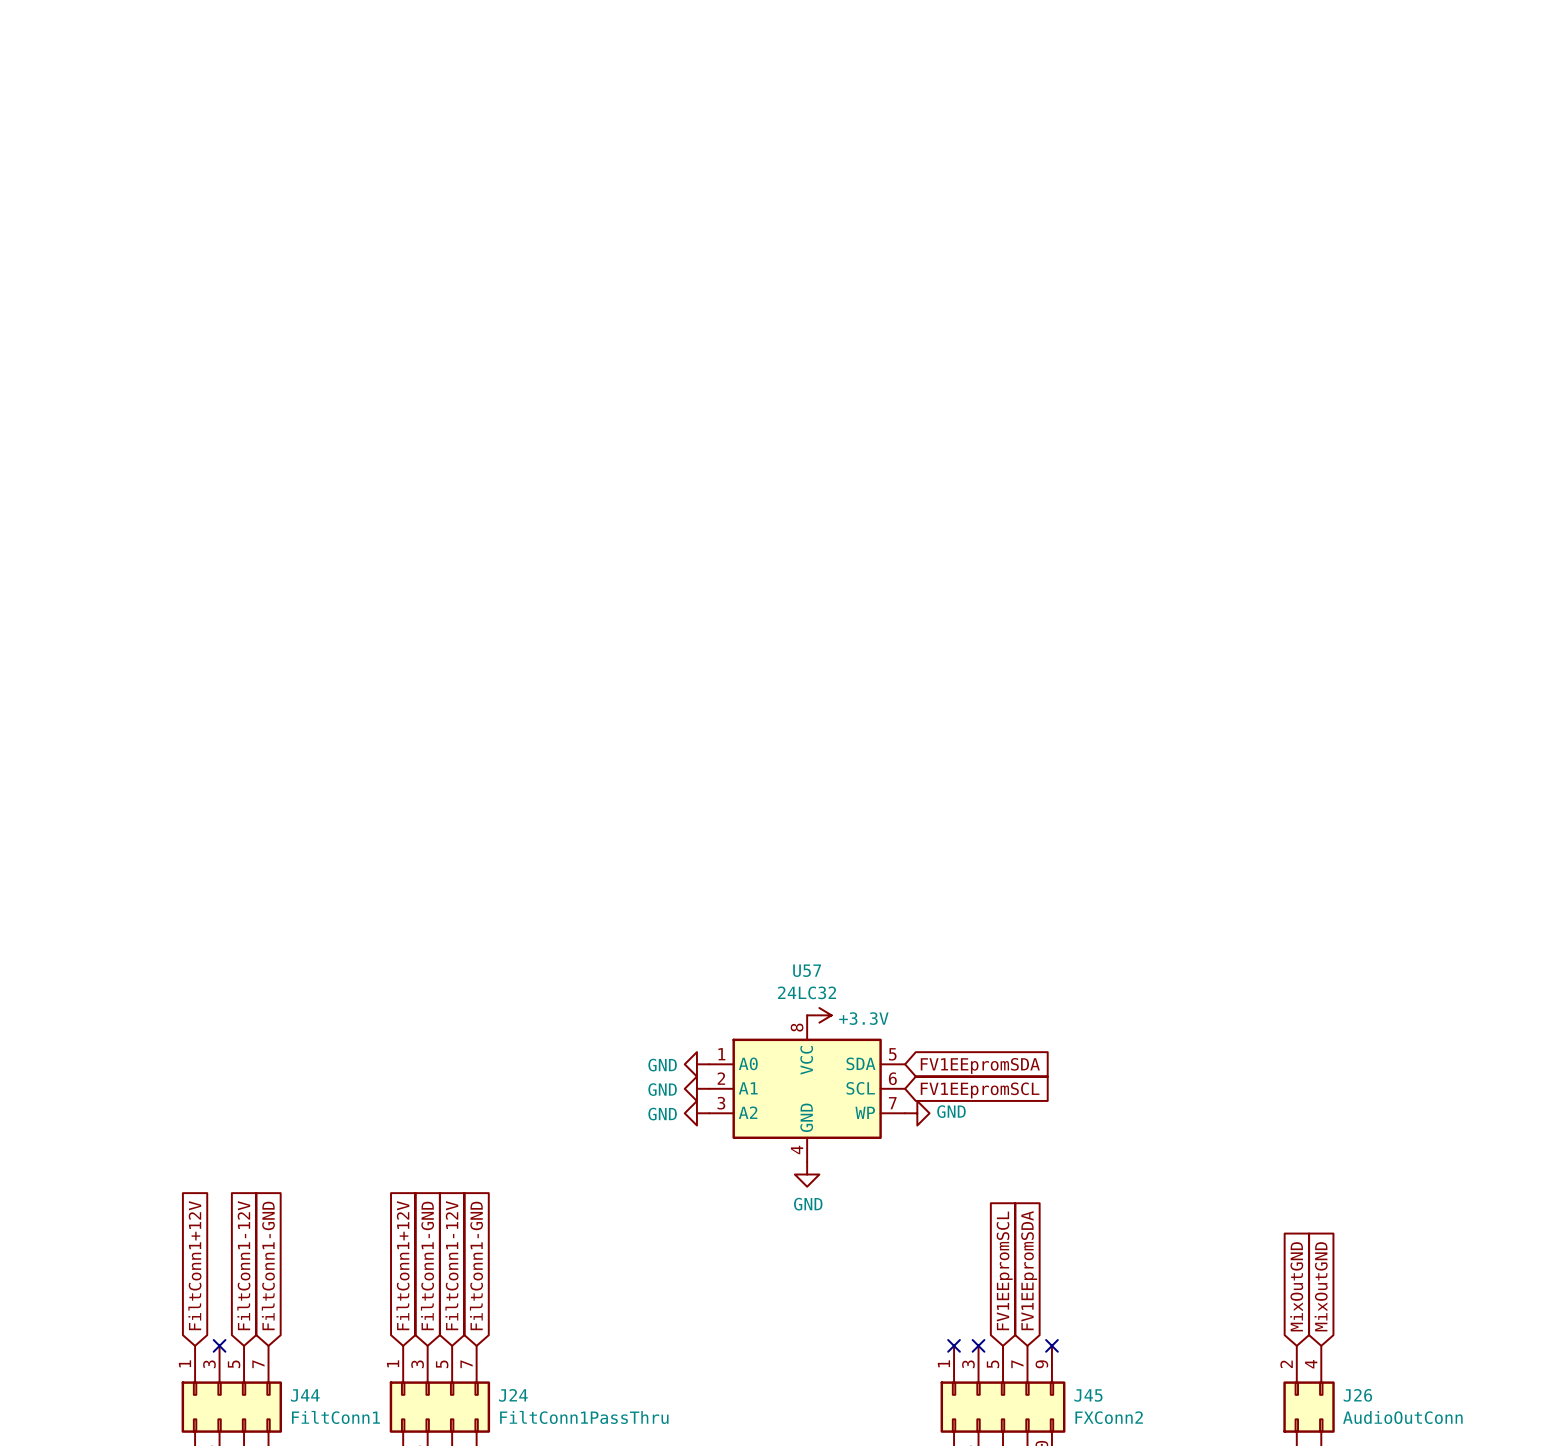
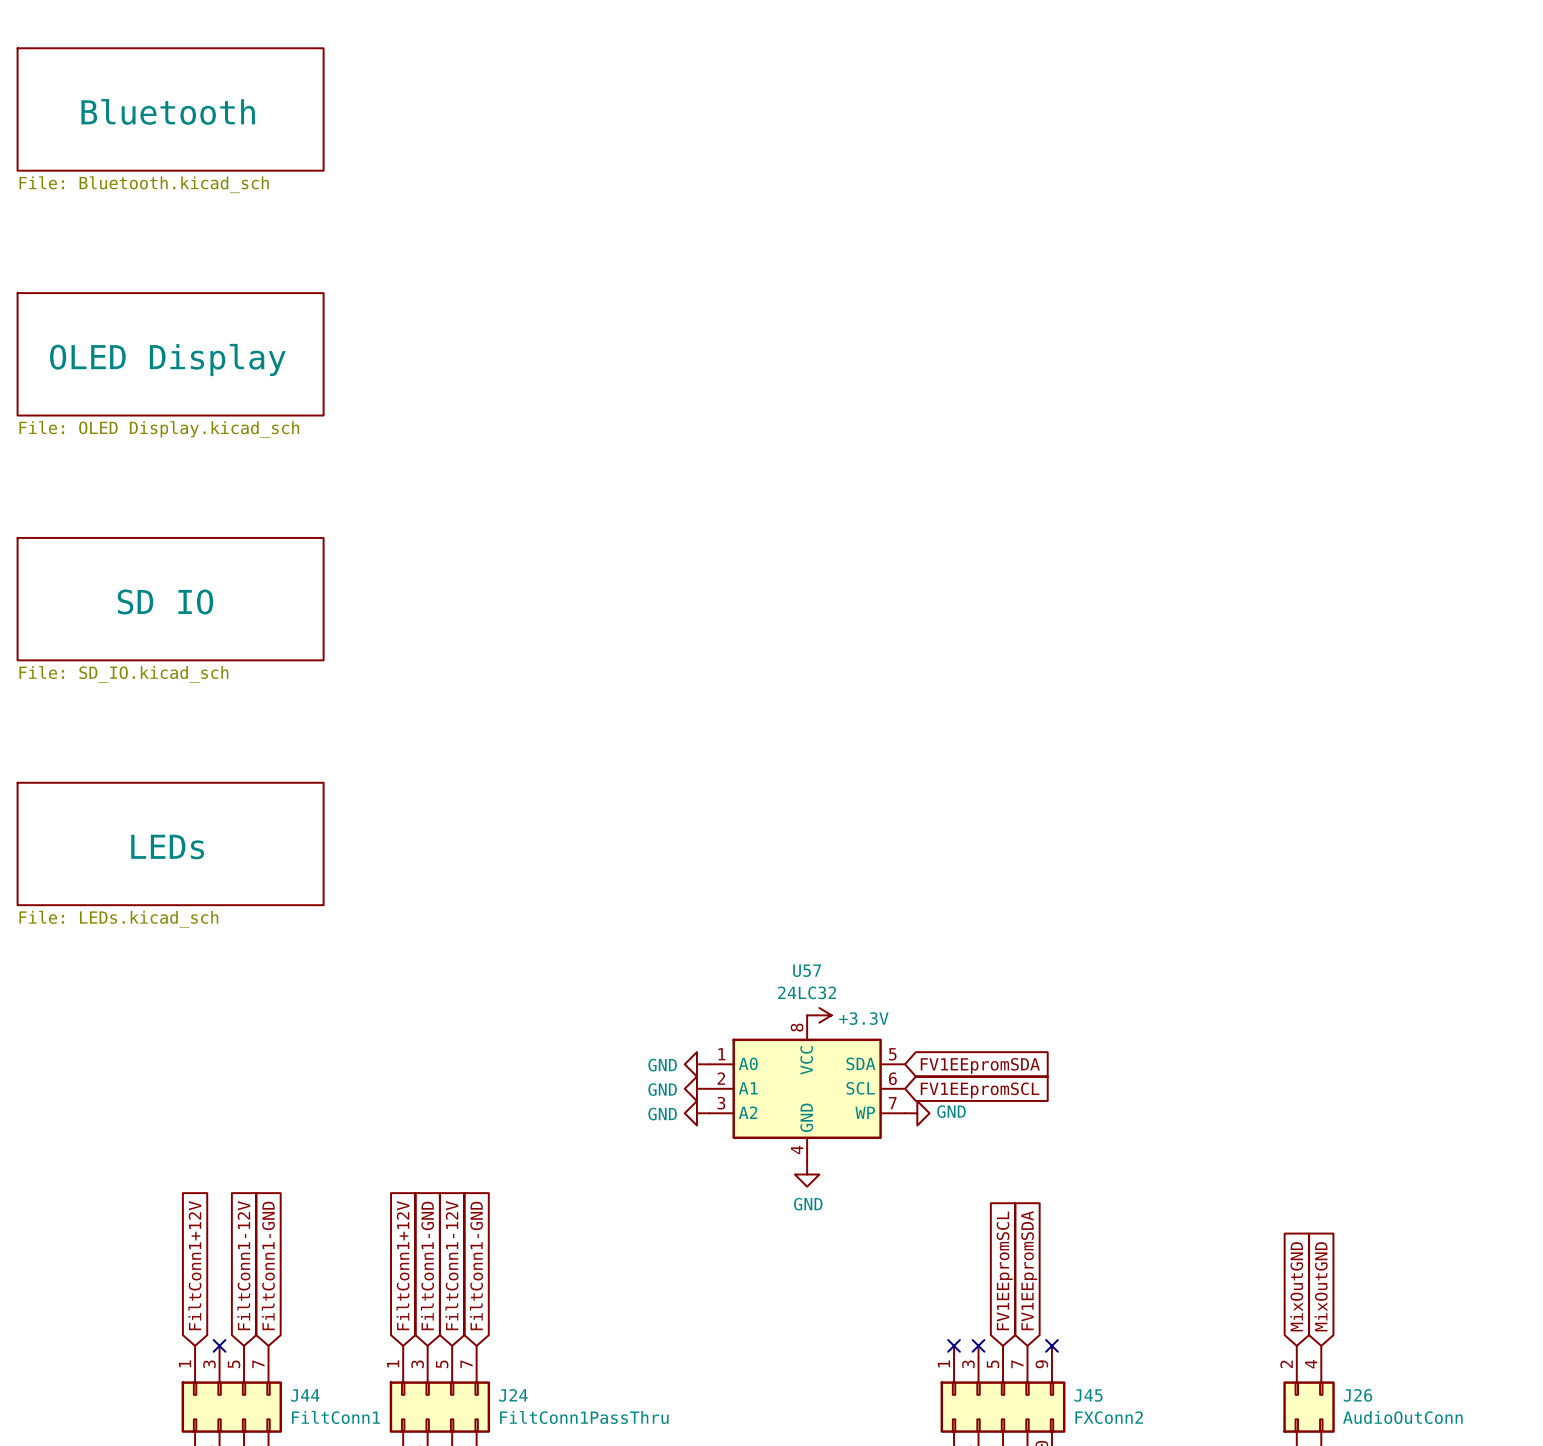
sheet Bluetooth: none -> File: Bluetooth.kicad_sch (170, 109)
sheet OLED Display: none -> File: OLED Display.kicad_sch (170, 354)
sheet SD IO: none -> File: SD_IO.kicad_sch (170, 599)
sheet LEDs: none -> File: LEDs.kicad_sch (170, 843)

